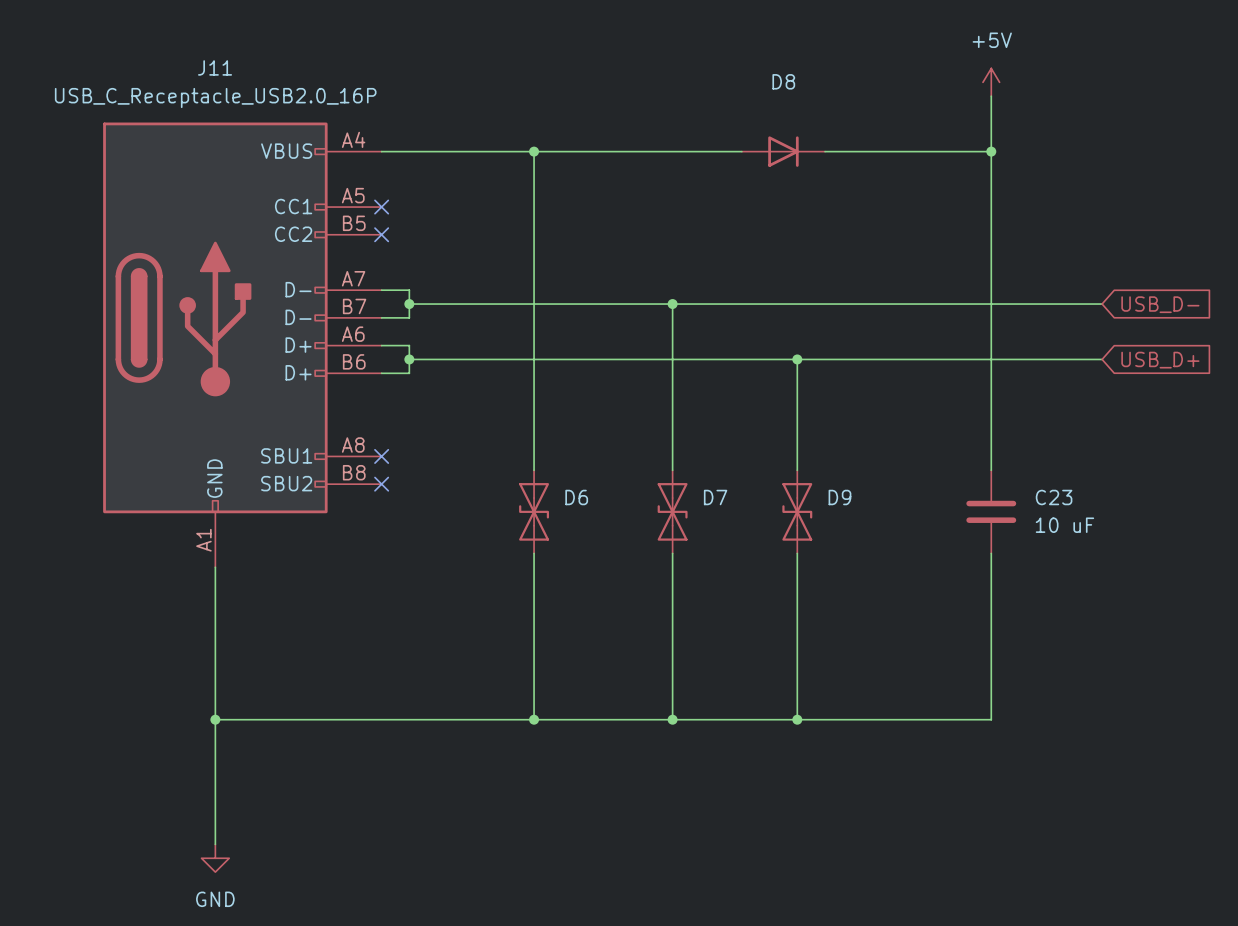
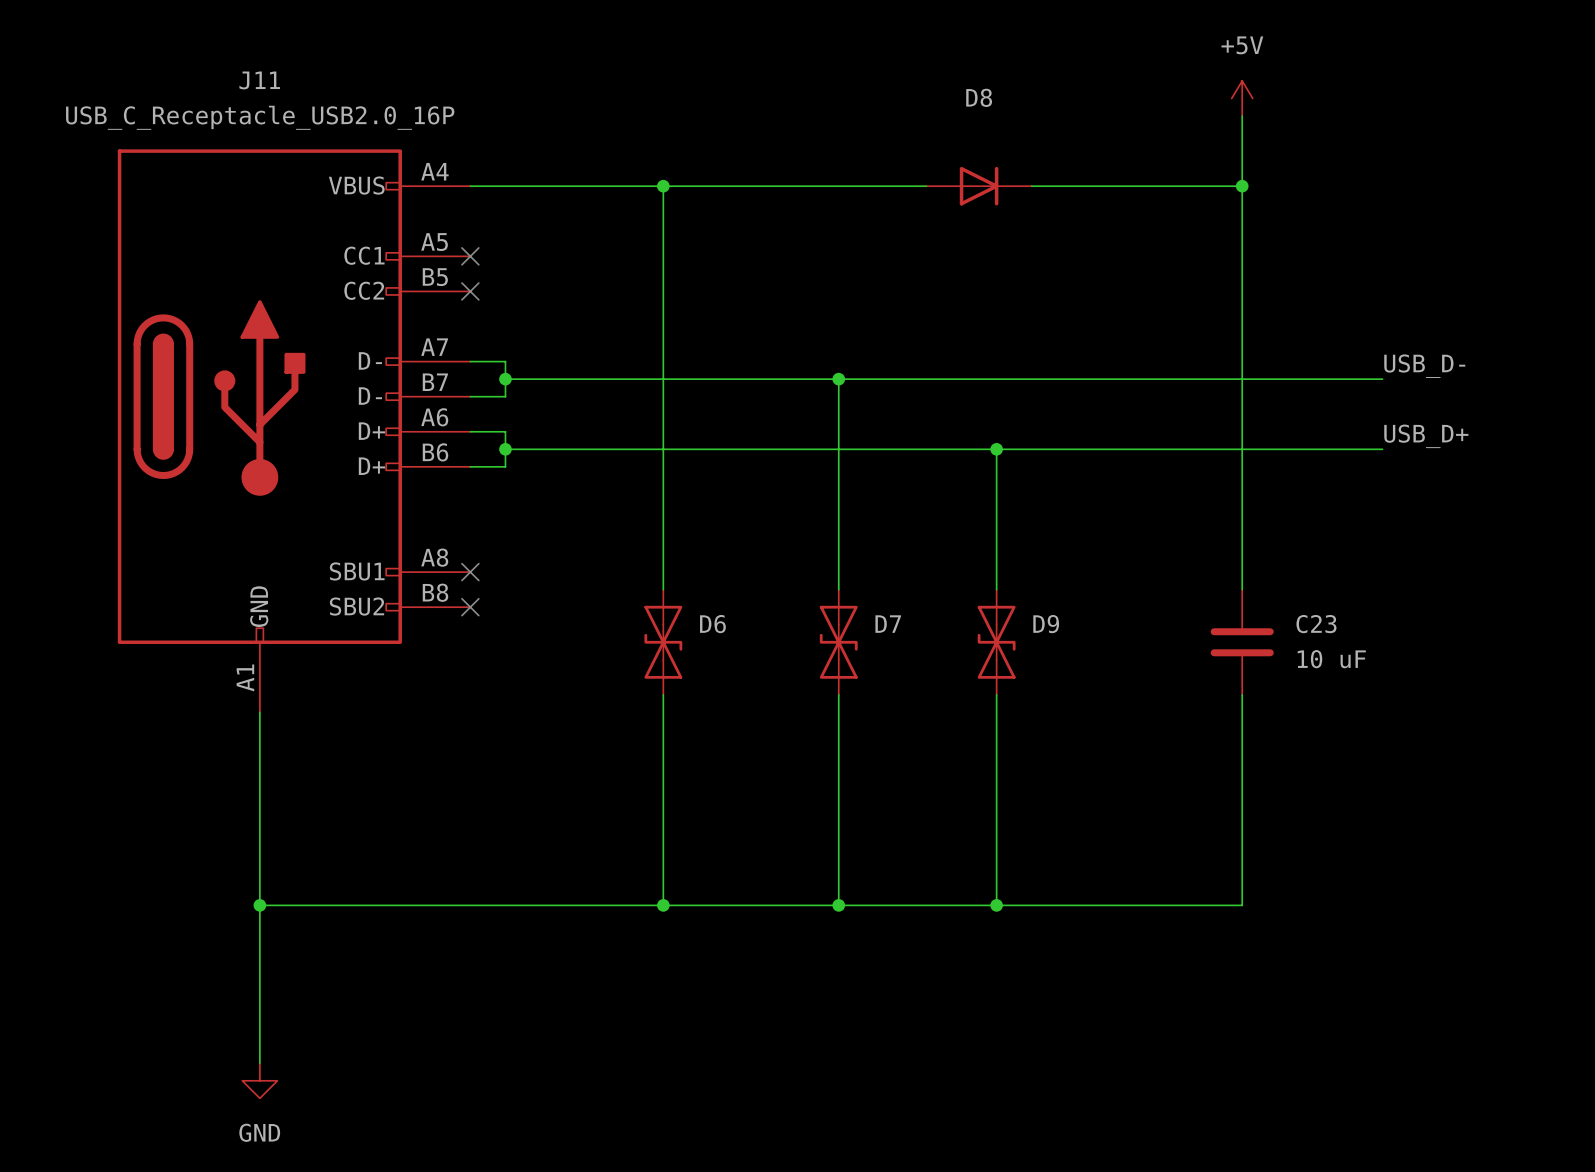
label: none -> USB_D- (1424, 366)
global label: USB_D- (1160, 304) -> none
label: none -> USB_D+ (1426, 436)
global label: USB_D+ (1160, 360) -> none

